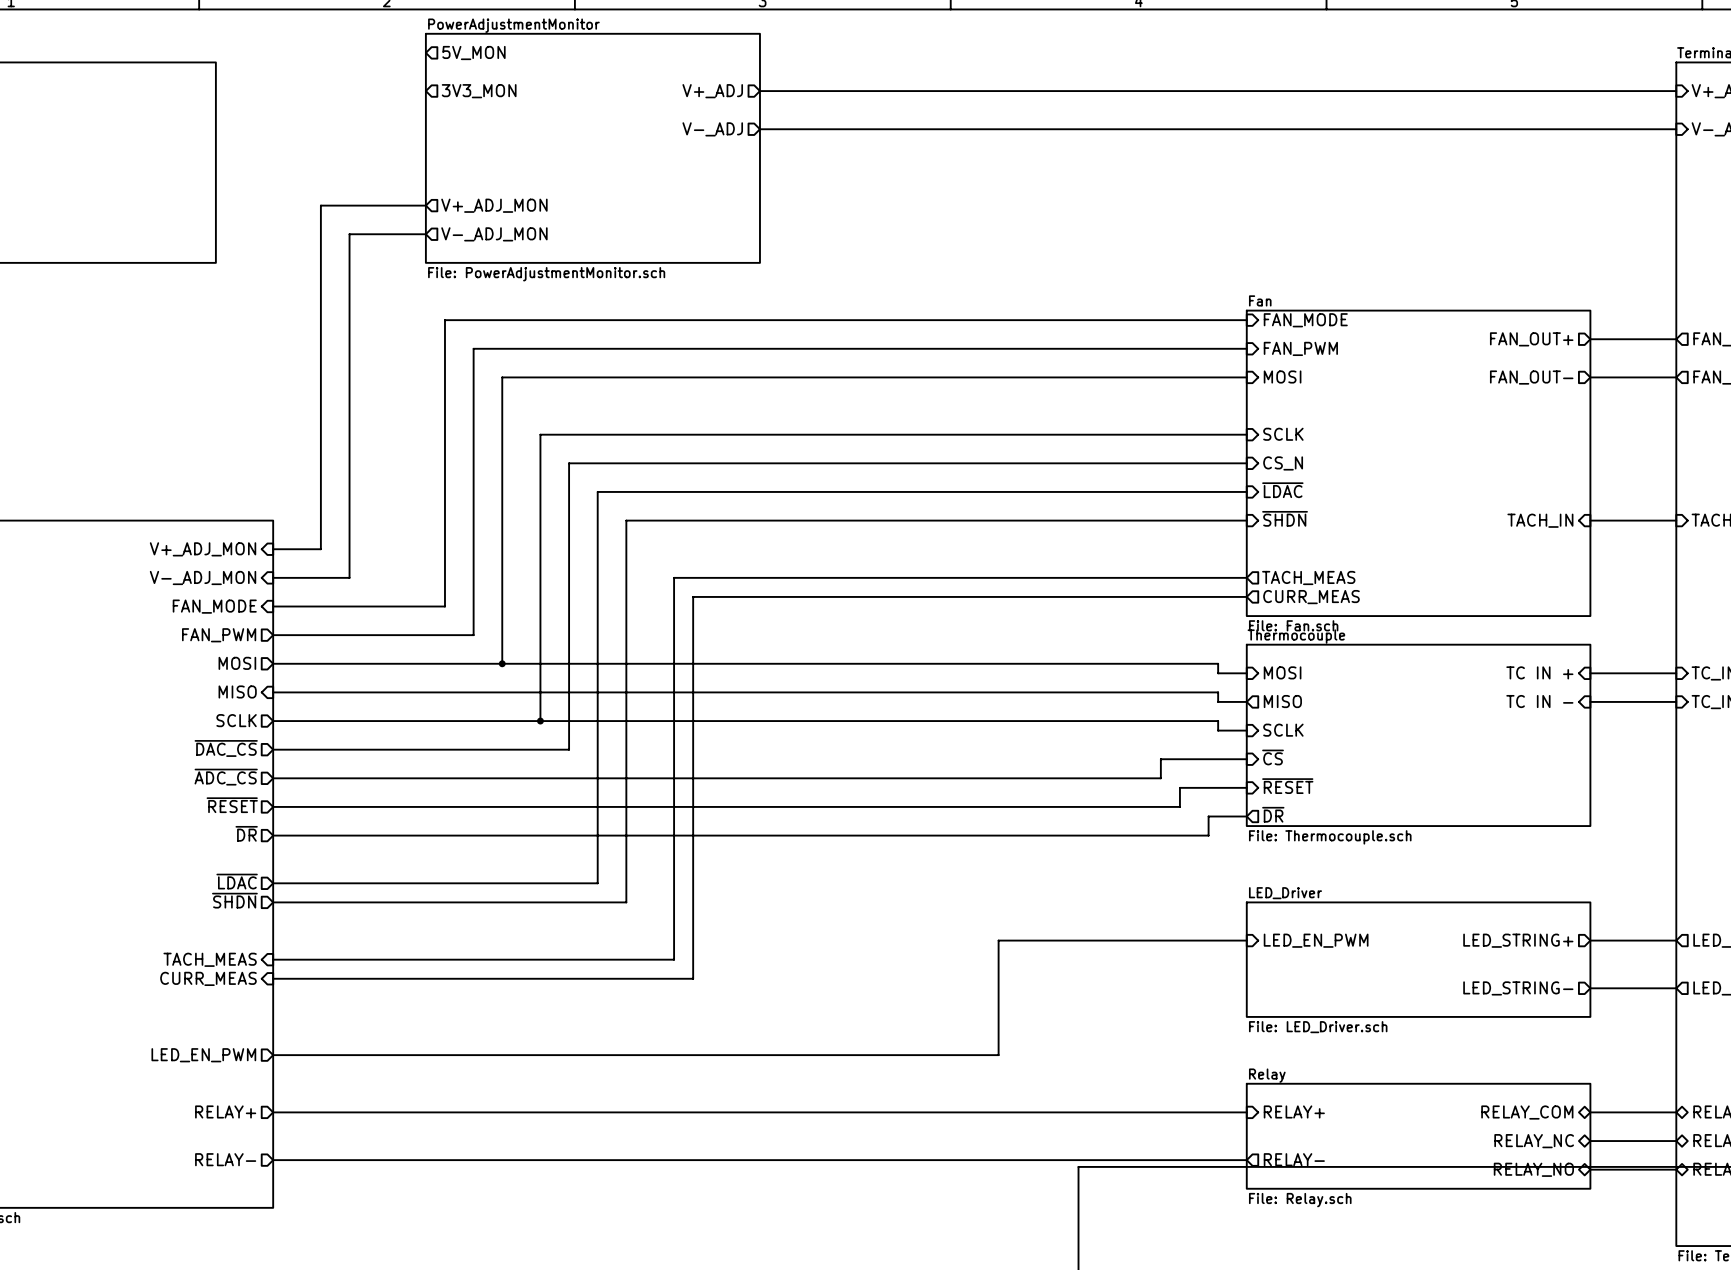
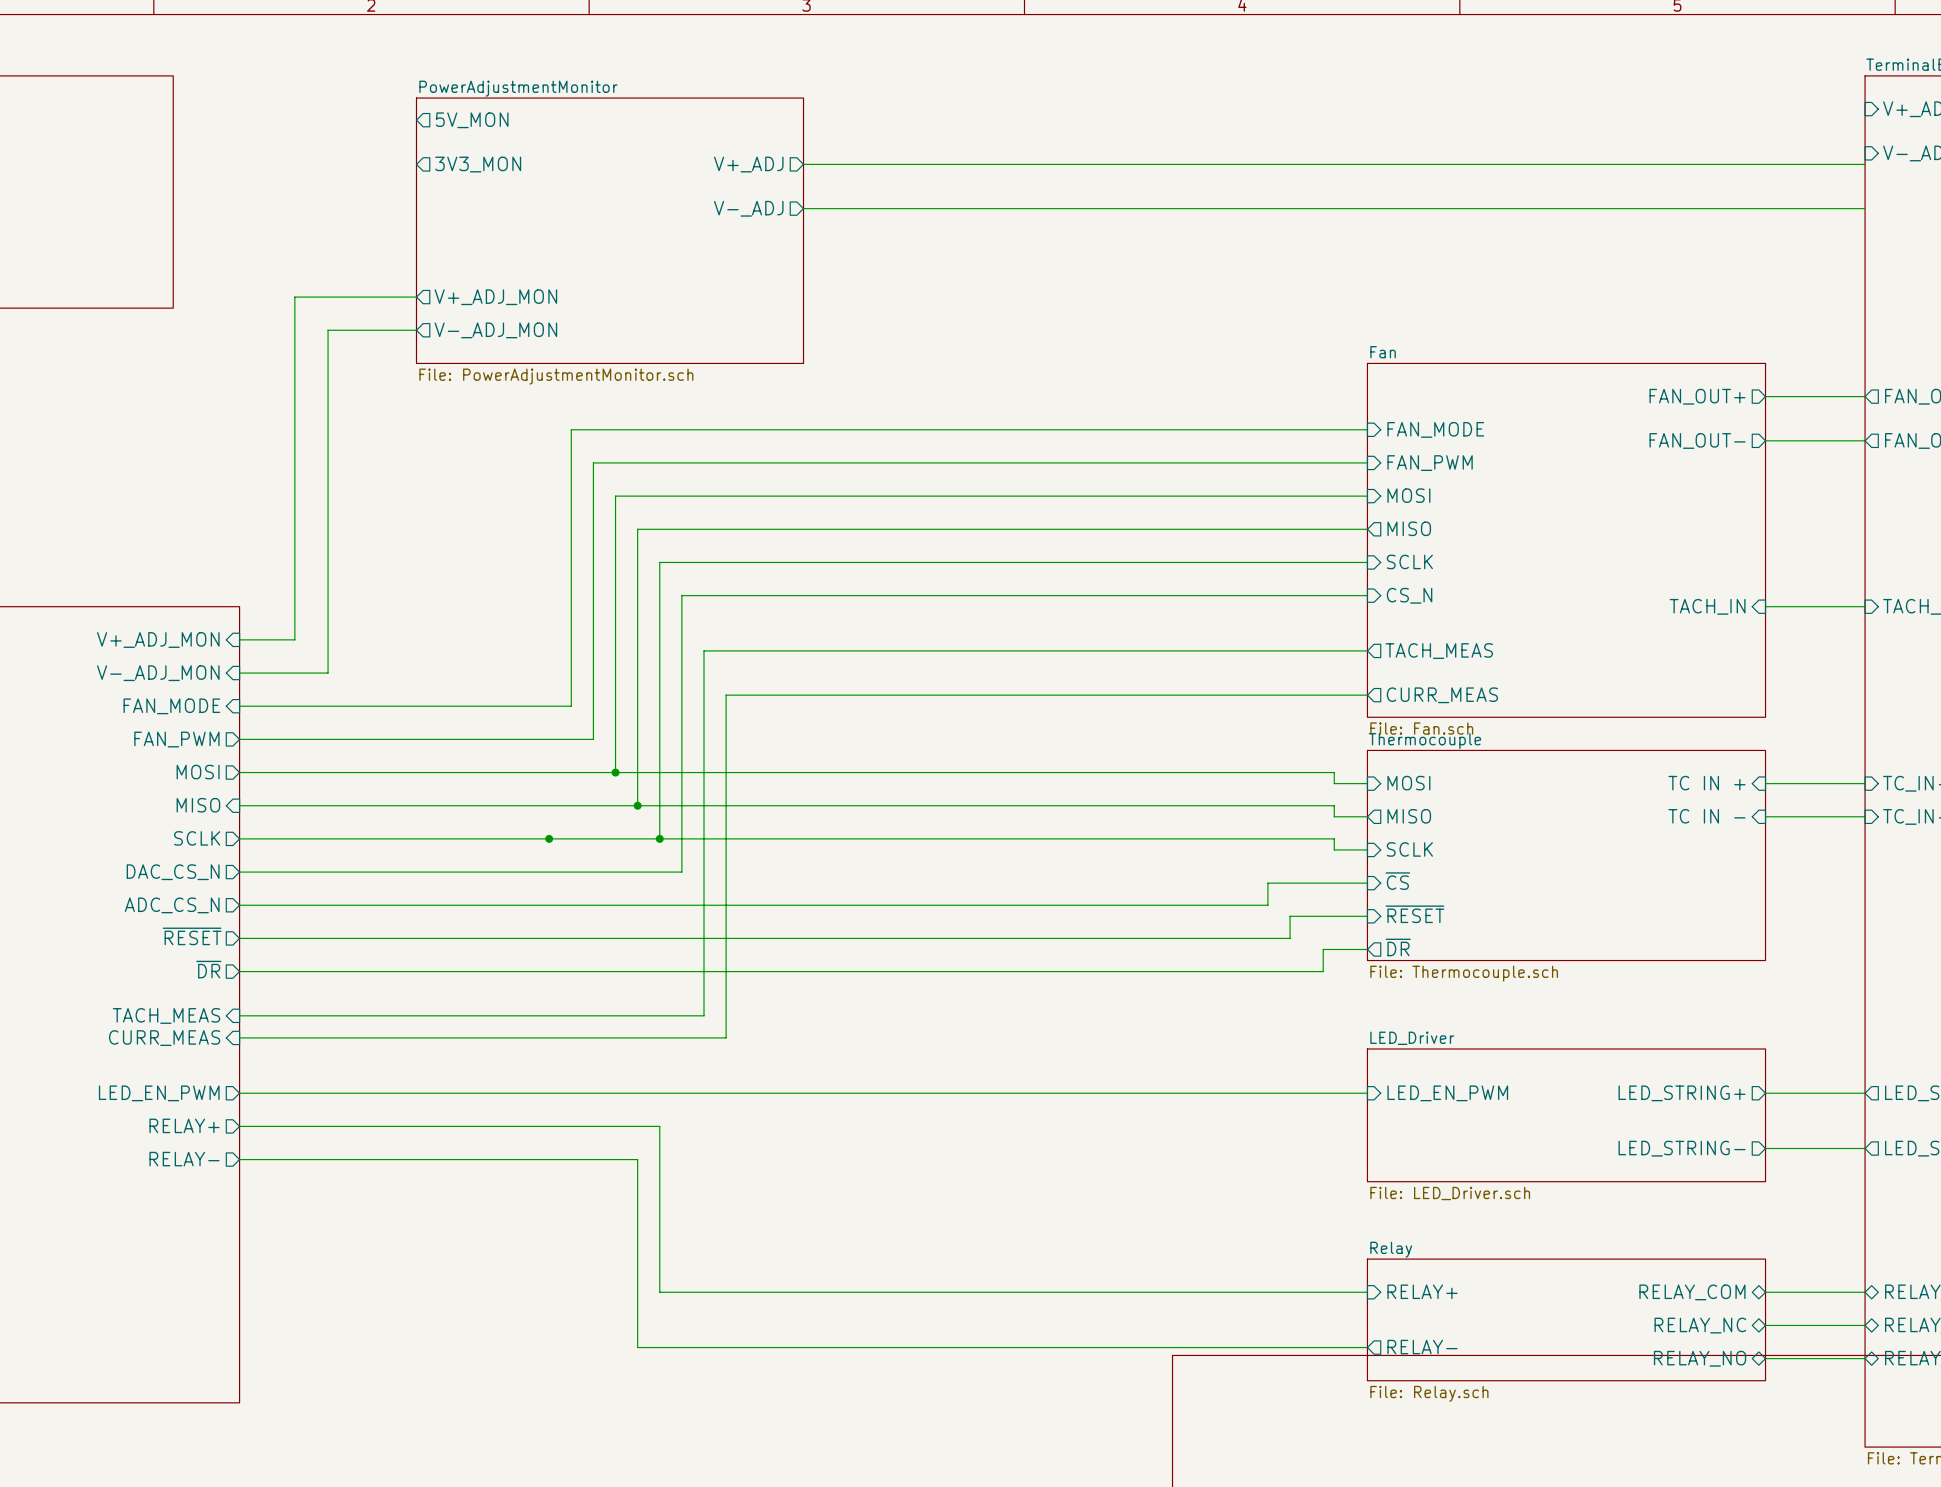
sheet pin position: 5V_MON (473, 53) -> 5V_MON (472, 120)
sheet pin position: 3V3_MON (479, 91) -> 3V3_MON (478, 164)
sheet pin position: V+_ADJ (712, 91) -> V+_ADJ (748, 164)
wire: (759, 91) (1676, 91) -> (803, 164) (1865, 164)
sheet pin position: V-_ADJ (712, 129) -> V-_ADJ (748, 208)
wire: (759, 129) (1676, 129) -> (803, 208) (1865, 208)
sheet PowerAdjustmentMonitor position: (592, 148) -> (610, 230)
wire: (425, 205) (320, 205) (320, 253) -> (416, 297) (294, 297)
sheet pin position: V+_ADJ_MON (494, 205) -> V+_ADJ_MON (495, 297)
wire: (425, 234) (349, 234) (349, 281) -> (416, 330) (328, 330)
sheet pin position: V-_ADJ_MON (494, 234) -> V-_ADJ_MON (495, 330)
wire: (1246, 320) (444, 320) (444, 606) -> (1367, 429) (571, 429) (571, 706) (438, 706)
sheet pin position: FAN_MODE (1305, 320) -> FAN_MODE (1435, 429)
wire: (1246, 348) (473, 348) (473, 635) -> (1367, 462) (593, 462) (593, 739) (471, 739)
sheet pin position: FAN_PWM (1300, 348) -> FAN_PWM (1430, 463)
sheet pin position: MOSI (1282, 376) -> MOSI (1408, 495)
wire: (1246, 377) (502, 377) (502, 663) -> none
wire: (1246, 434) (540, 434) (540, 721) -> none
sheet pin position: SCLK (1283, 434) -> SCLK (1409, 561)
wire: none -> (1367, 529) (637, 529) (637, 805)
sheet pin: none -> MISO (1409, 528)
wire: (1246, 463) (569, 463) (569, 749) -> (1367, 595) (681, 595) (681, 872) (582, 872)
sheet pin position: CS_N (1283, 463) -> CS_N (1409, 595)
wire: none -> (1367, 562) (659, 562) (659, 838)
sheet pin: ~{LDAC} (1282, 490) -> none
wire: (597, 491) (1246, 491) -> (615, 573) (615, 496) (1367, 496)
sheet pin: ~{SHDN} (1285, 518) -> none
wire: (1246, 520) (626, 520) (626, 902) (273, 902) -> none
wire: (674, 577) (1246, 577) -> (703, 673) (703, 650) (1367, 650)
sheet pin position: TACH_MEAS (1308, 577) -> TACH_MEAS (1439, 651)
junction: (502, 663) -> none
wire: (597, 663) (597, 883) (273, 883) -> none
junction: none -> (615, 772)
junction: none -> (637, 805)
junction: none -> (659, 838)
sheet pin: ~{DAC_CS} (226, 748) -> DAC_CS_N (173, 872)
sheet pin: ~{ADC_CS} (226, 777) -> ADC_CS_N (172, 905)
wire: (674, 873) (674, 959) (273, 959) -> (703, 1015) (239, 1015)
sheet pin: ~{LDAC} (237, 881) -> none
wire: (693, 892) (693, 978) (273, 978) -> (726, 1037) (239, 1037)
sheet pin: ~{SHDN} (234, 900) -> none
wire: (998, 940) (998, 1055) (273, 1055) -> (1079, 1093) (239, 1093)
sheet pin position: TACH_MEAS (210, 959) -> TACH_MEAS (166, 1015)
sheet pin position: CURR_MEAS (208, 978) -> CURR_MEAS (164, 1038)
sheet pin position: LED_EN_PWM (203, 1055) -> LED_EN_PWM (159, 1093)
sheet pin position: RELAY+ (225, 1111) -> RELAY+ (184, 1125)
wire: (273, 1112) (635, 1112) -> (239, 1126) (659, 1126) (659, 1292)
sheet pin position: RELAY- (225, 1159) -> RELAY- (184, 1159)
wire: (273, 1160) (616, 1160) -> (239, 1159) (637, 1159) (637, 1347)

